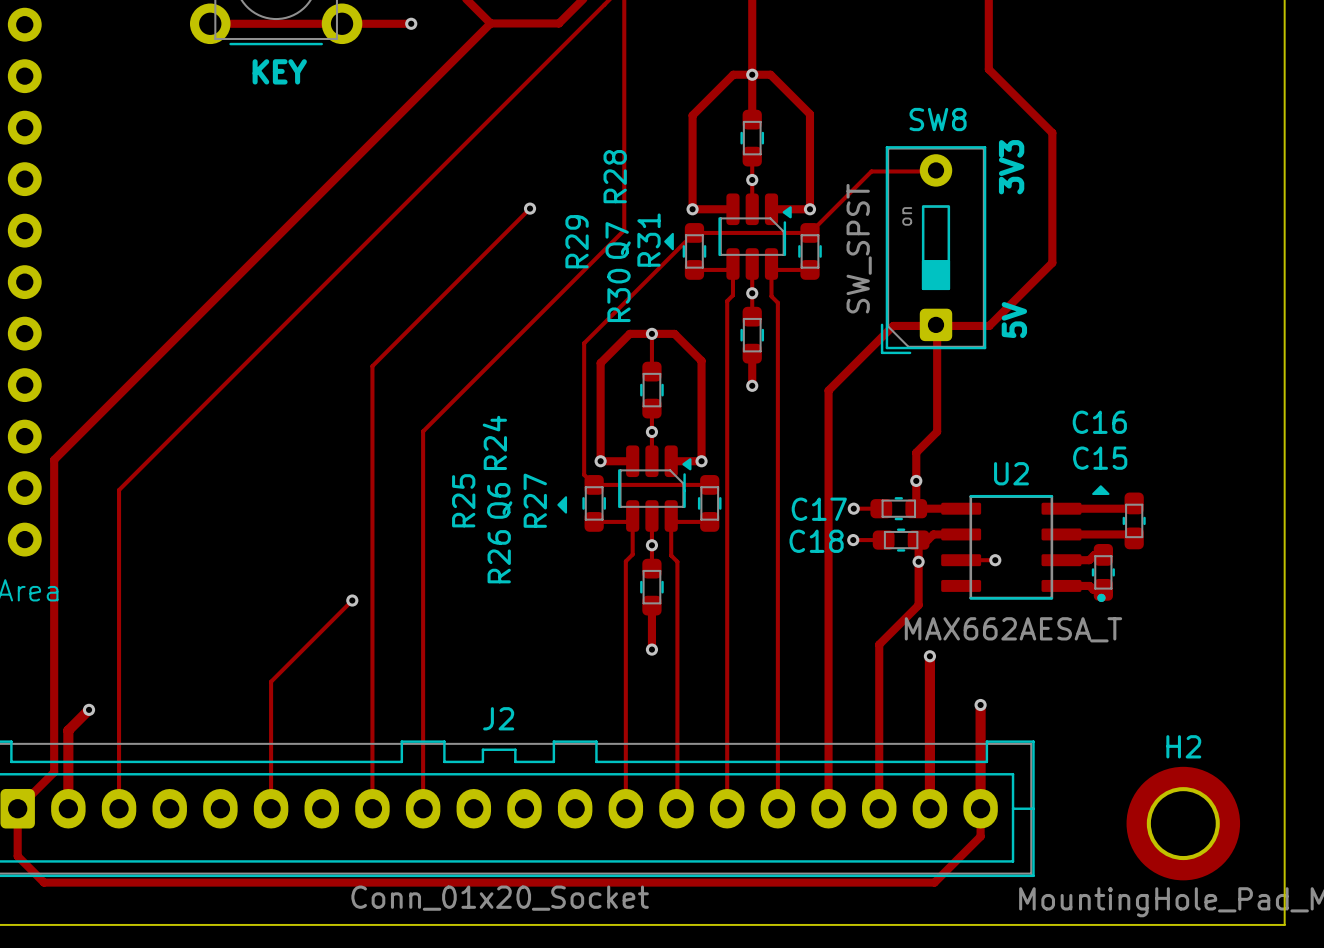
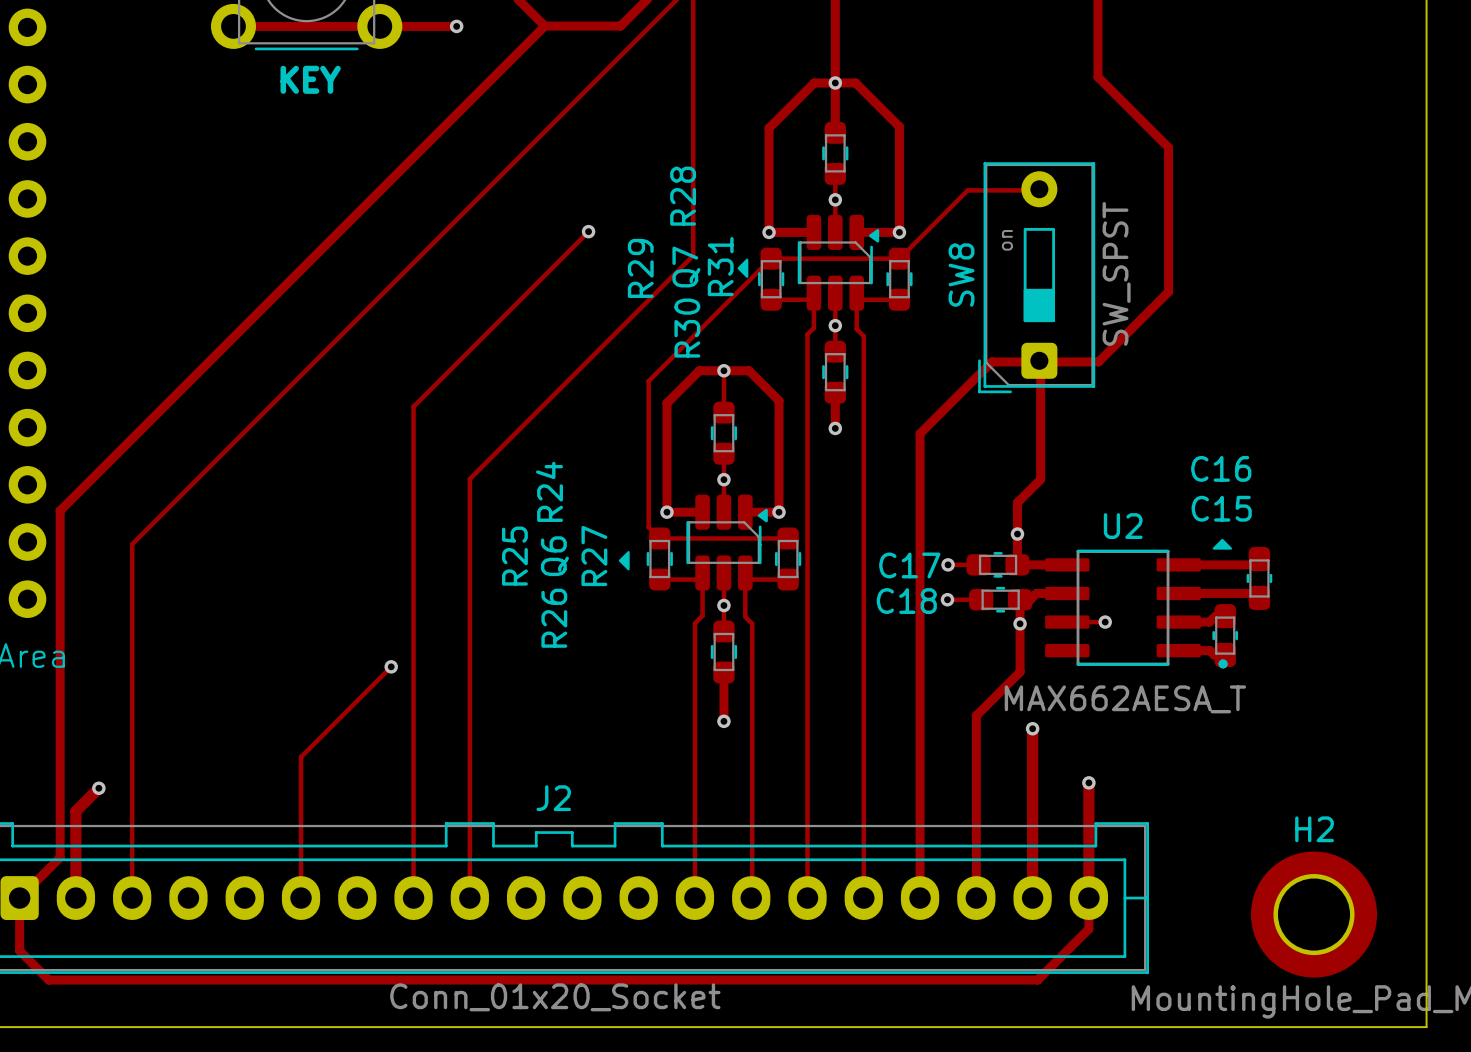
SW8 name rotation: 0° (938, 119) -> 90° counterclockwise (961, 275)
SW8 name position: SW8 (938, 119) -> SW8 (961, 275)
text: 3V3 (1011, 167) -> none
SW8 value position: SW_SPST (859, 248) -> SW_SPST (1116, 273)
text: 5V (1014, 320) -> none

